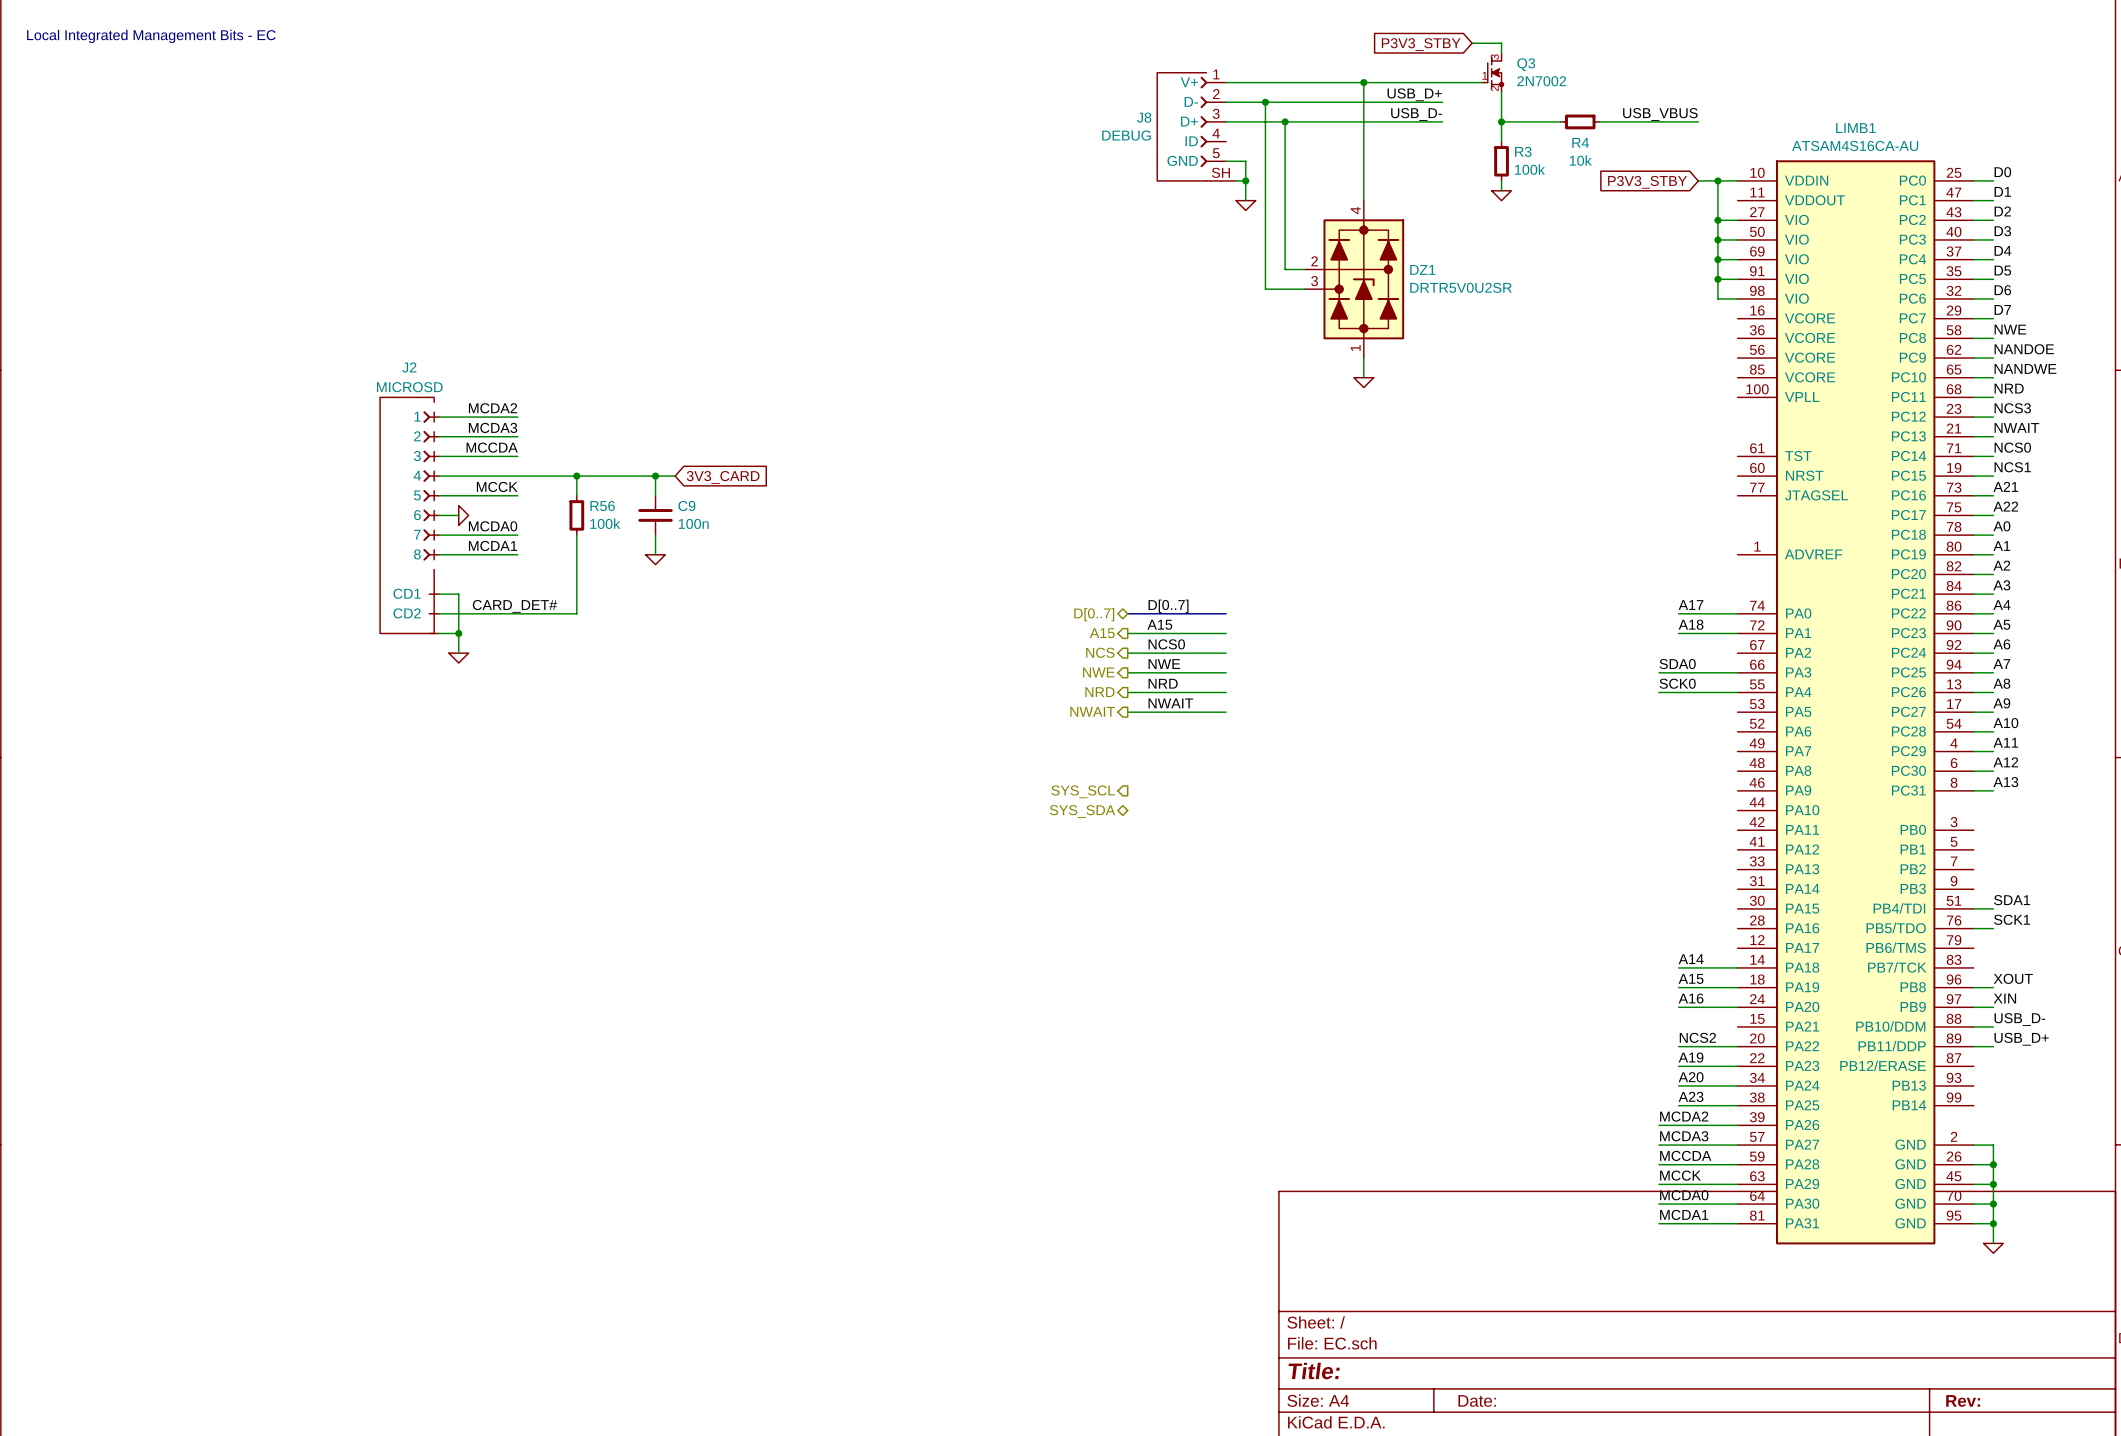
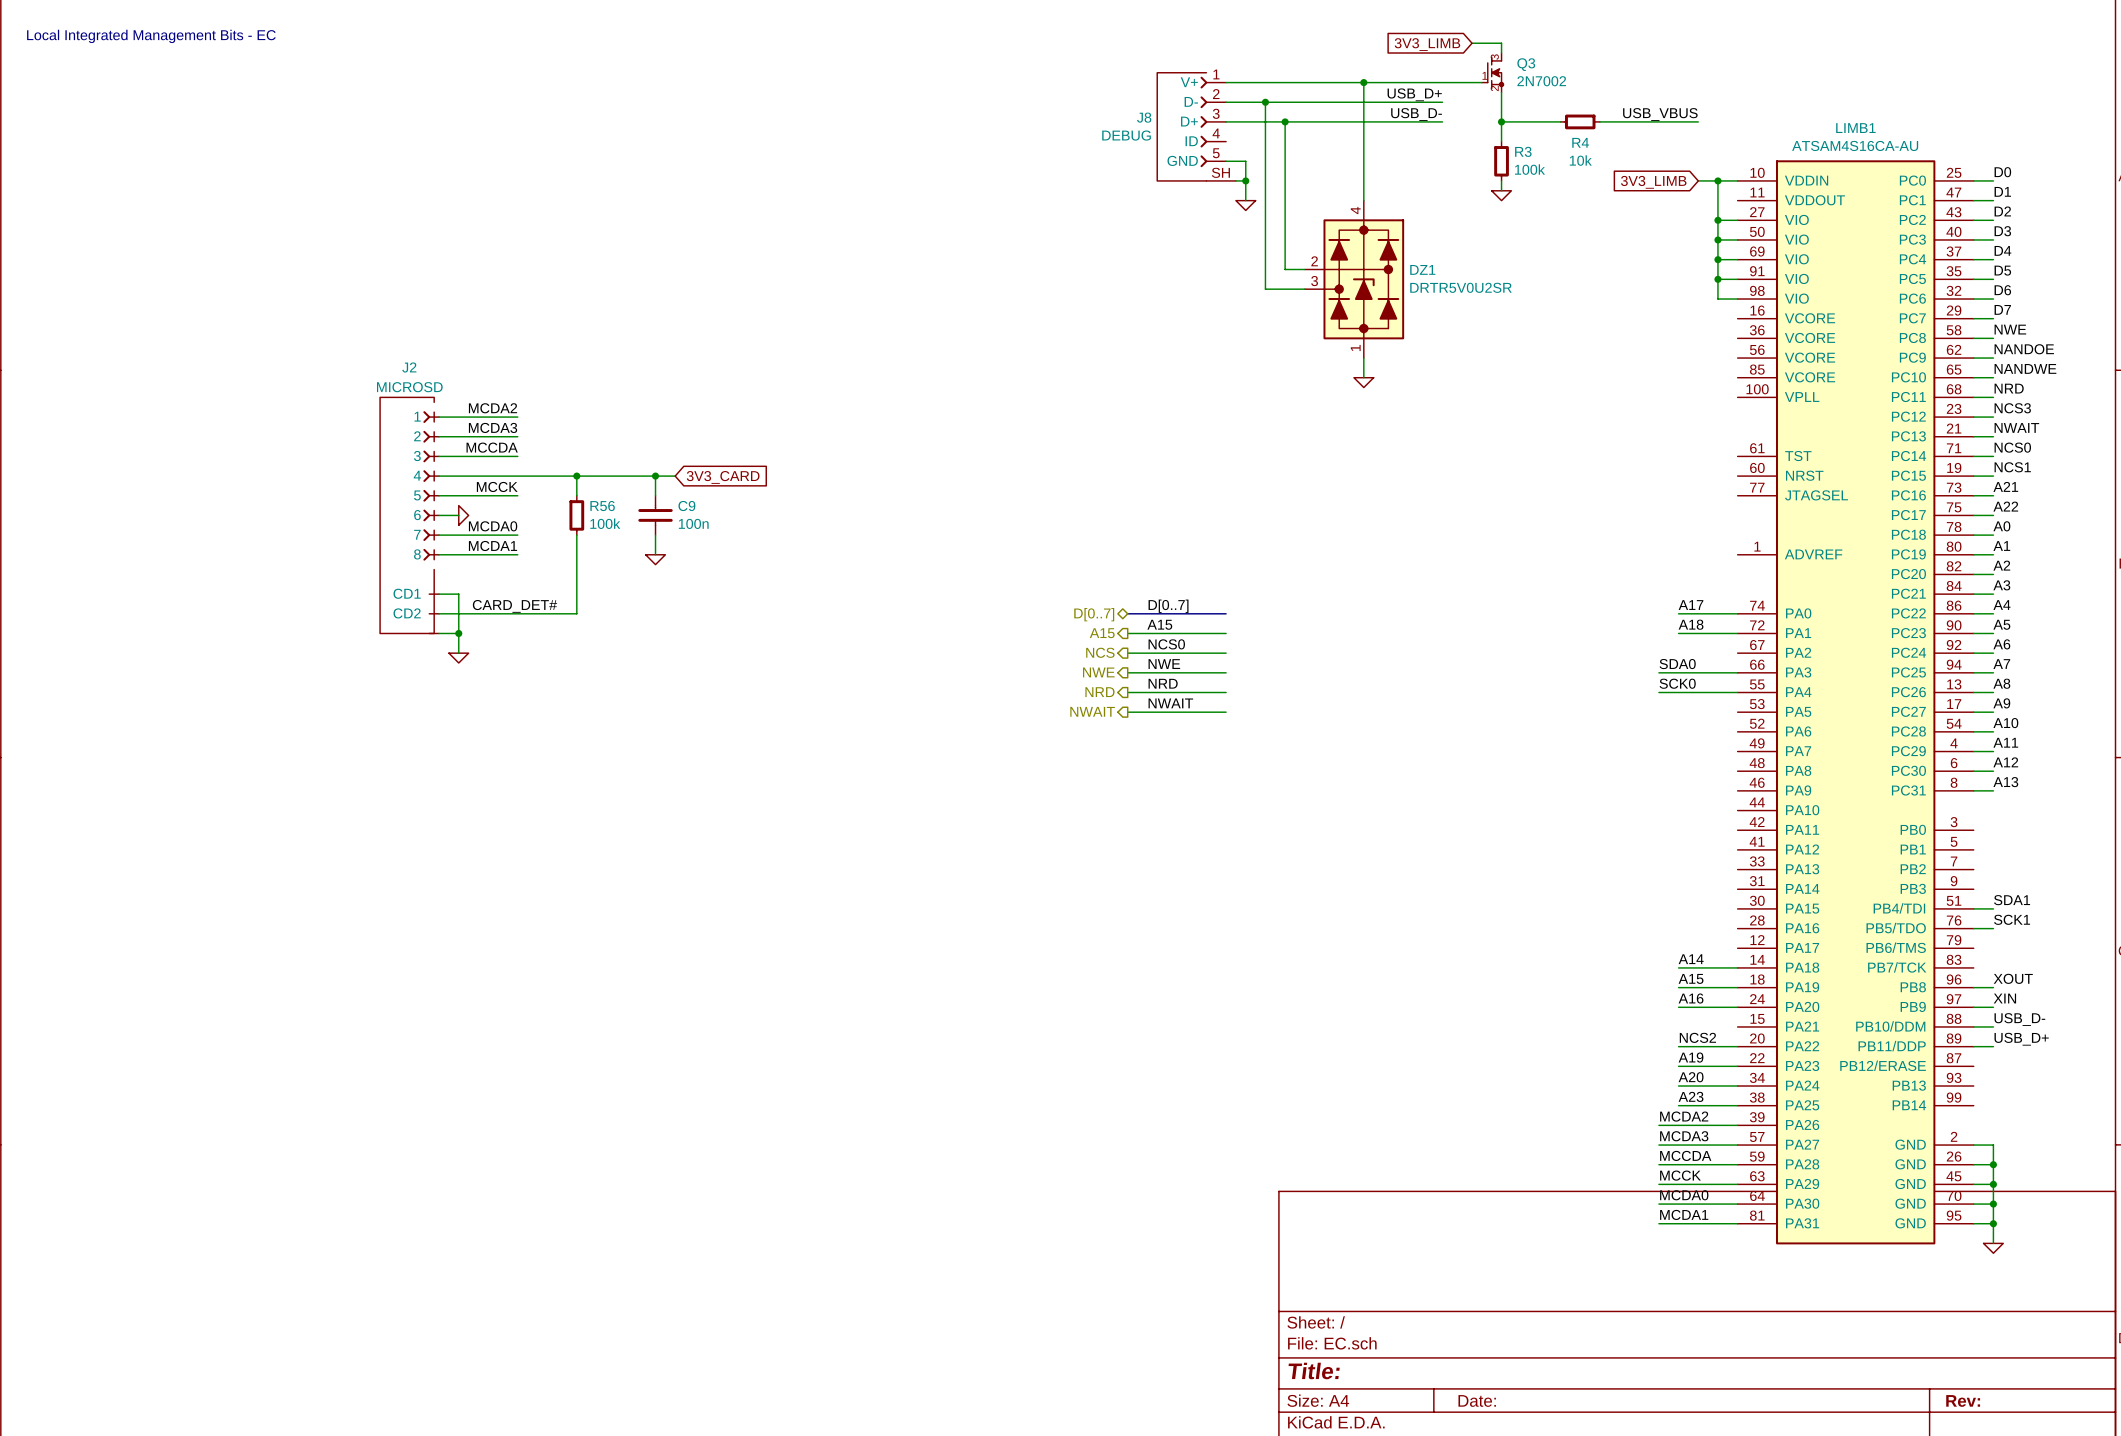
global label: P3V3_STBY (1421, 44) -> 3V3_LIMB (1427, 44)
global label: P3V3_STBY (1647, 182) -> 3V3_LIMB (1653, 182)
hierarchical label: SYS_SCL (1083, 791) -> none
hierarchical label: SYS_SDA (1082, 811) -> none

